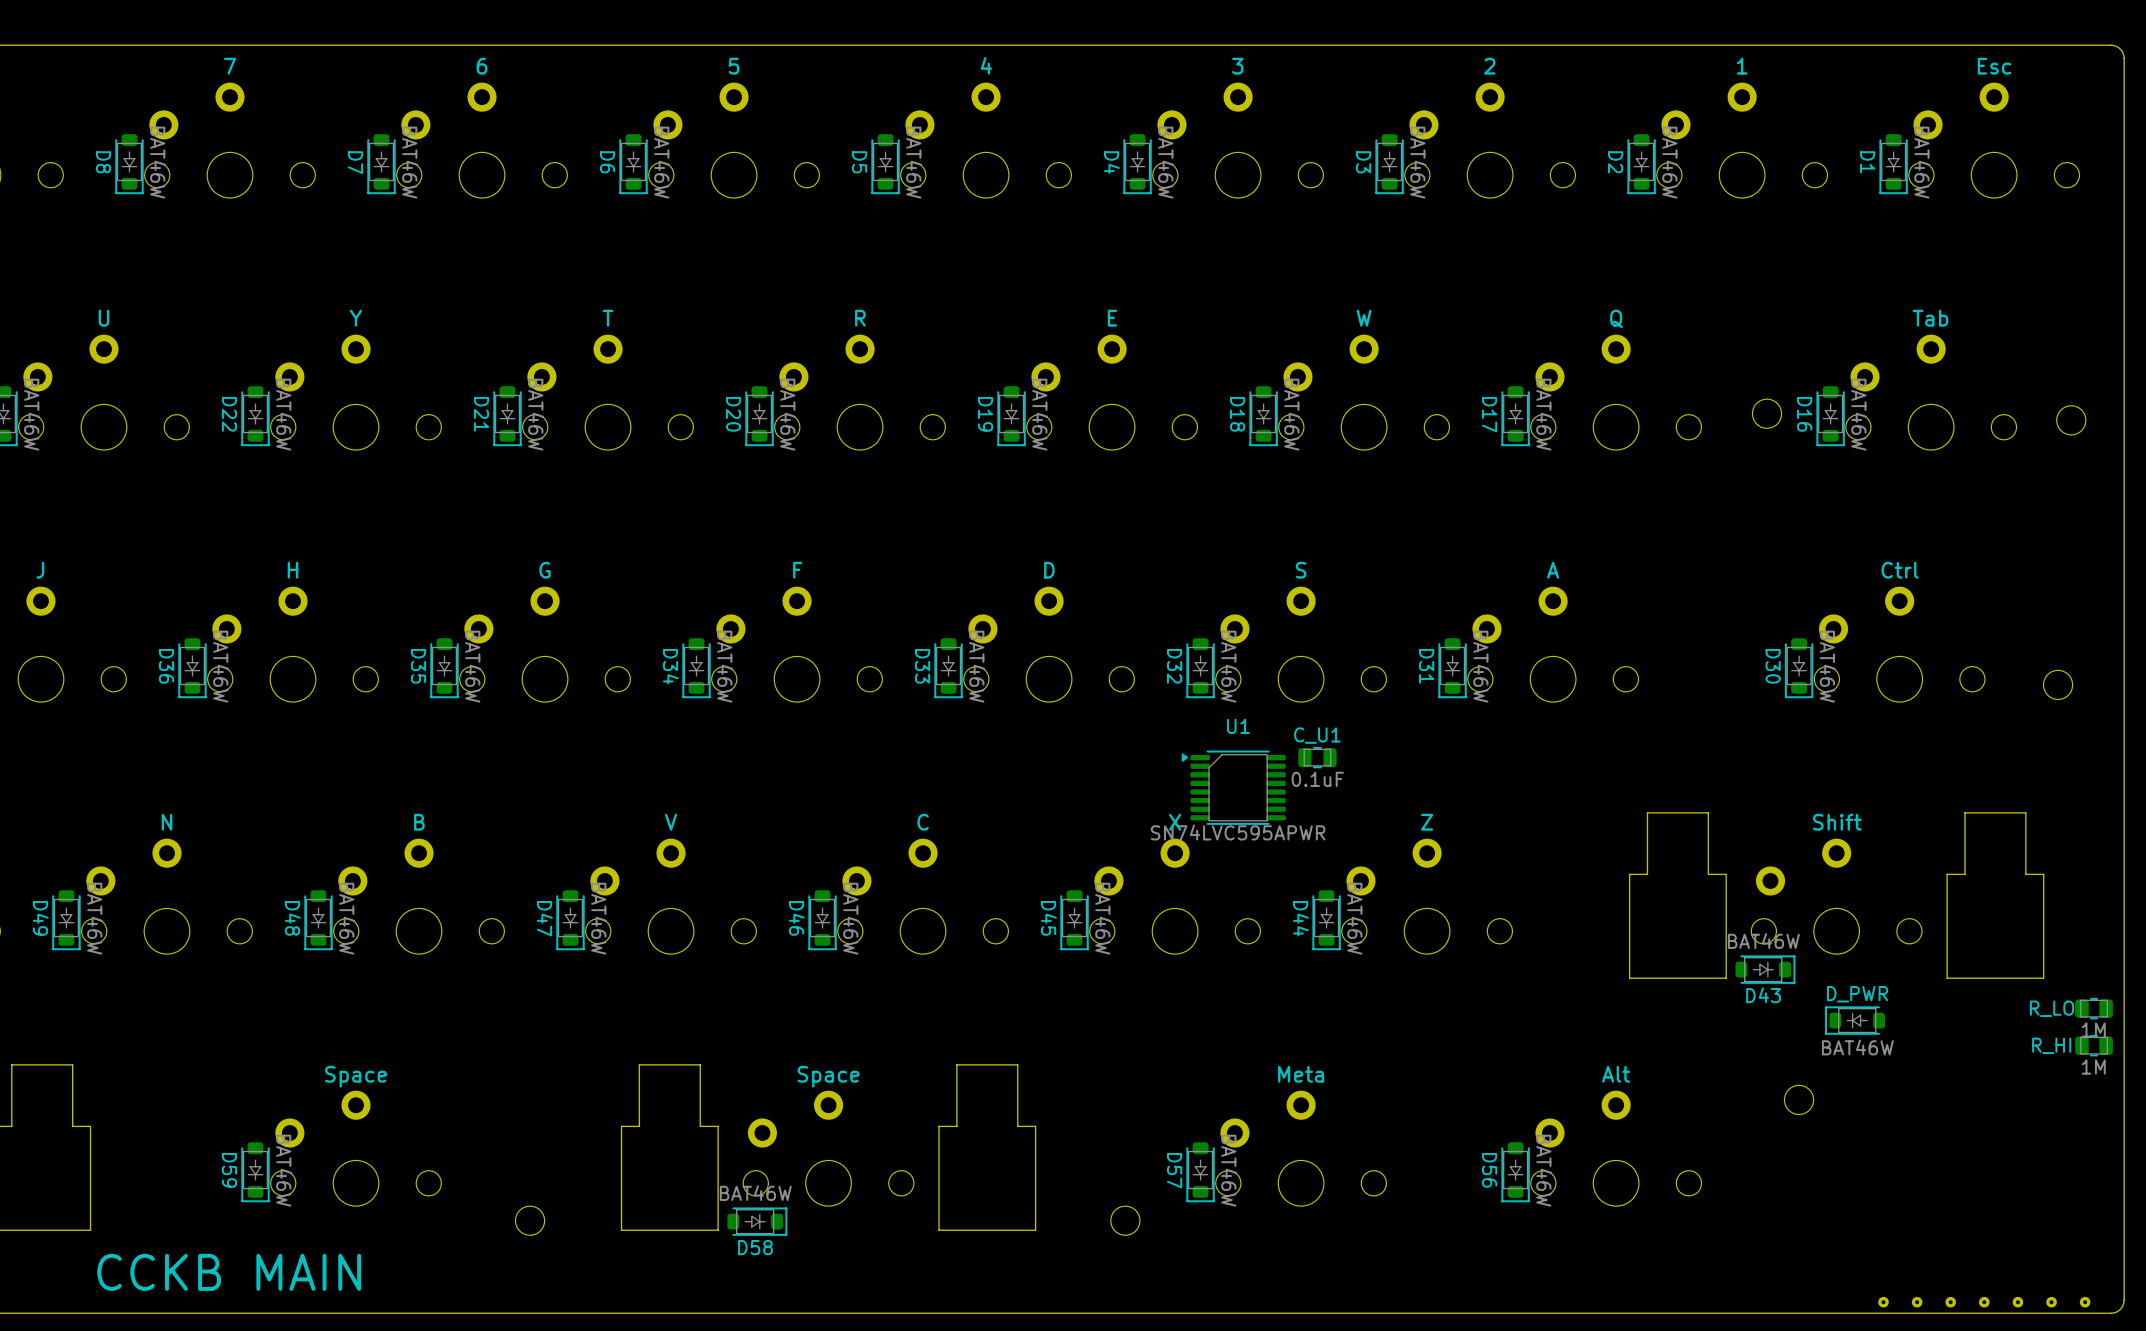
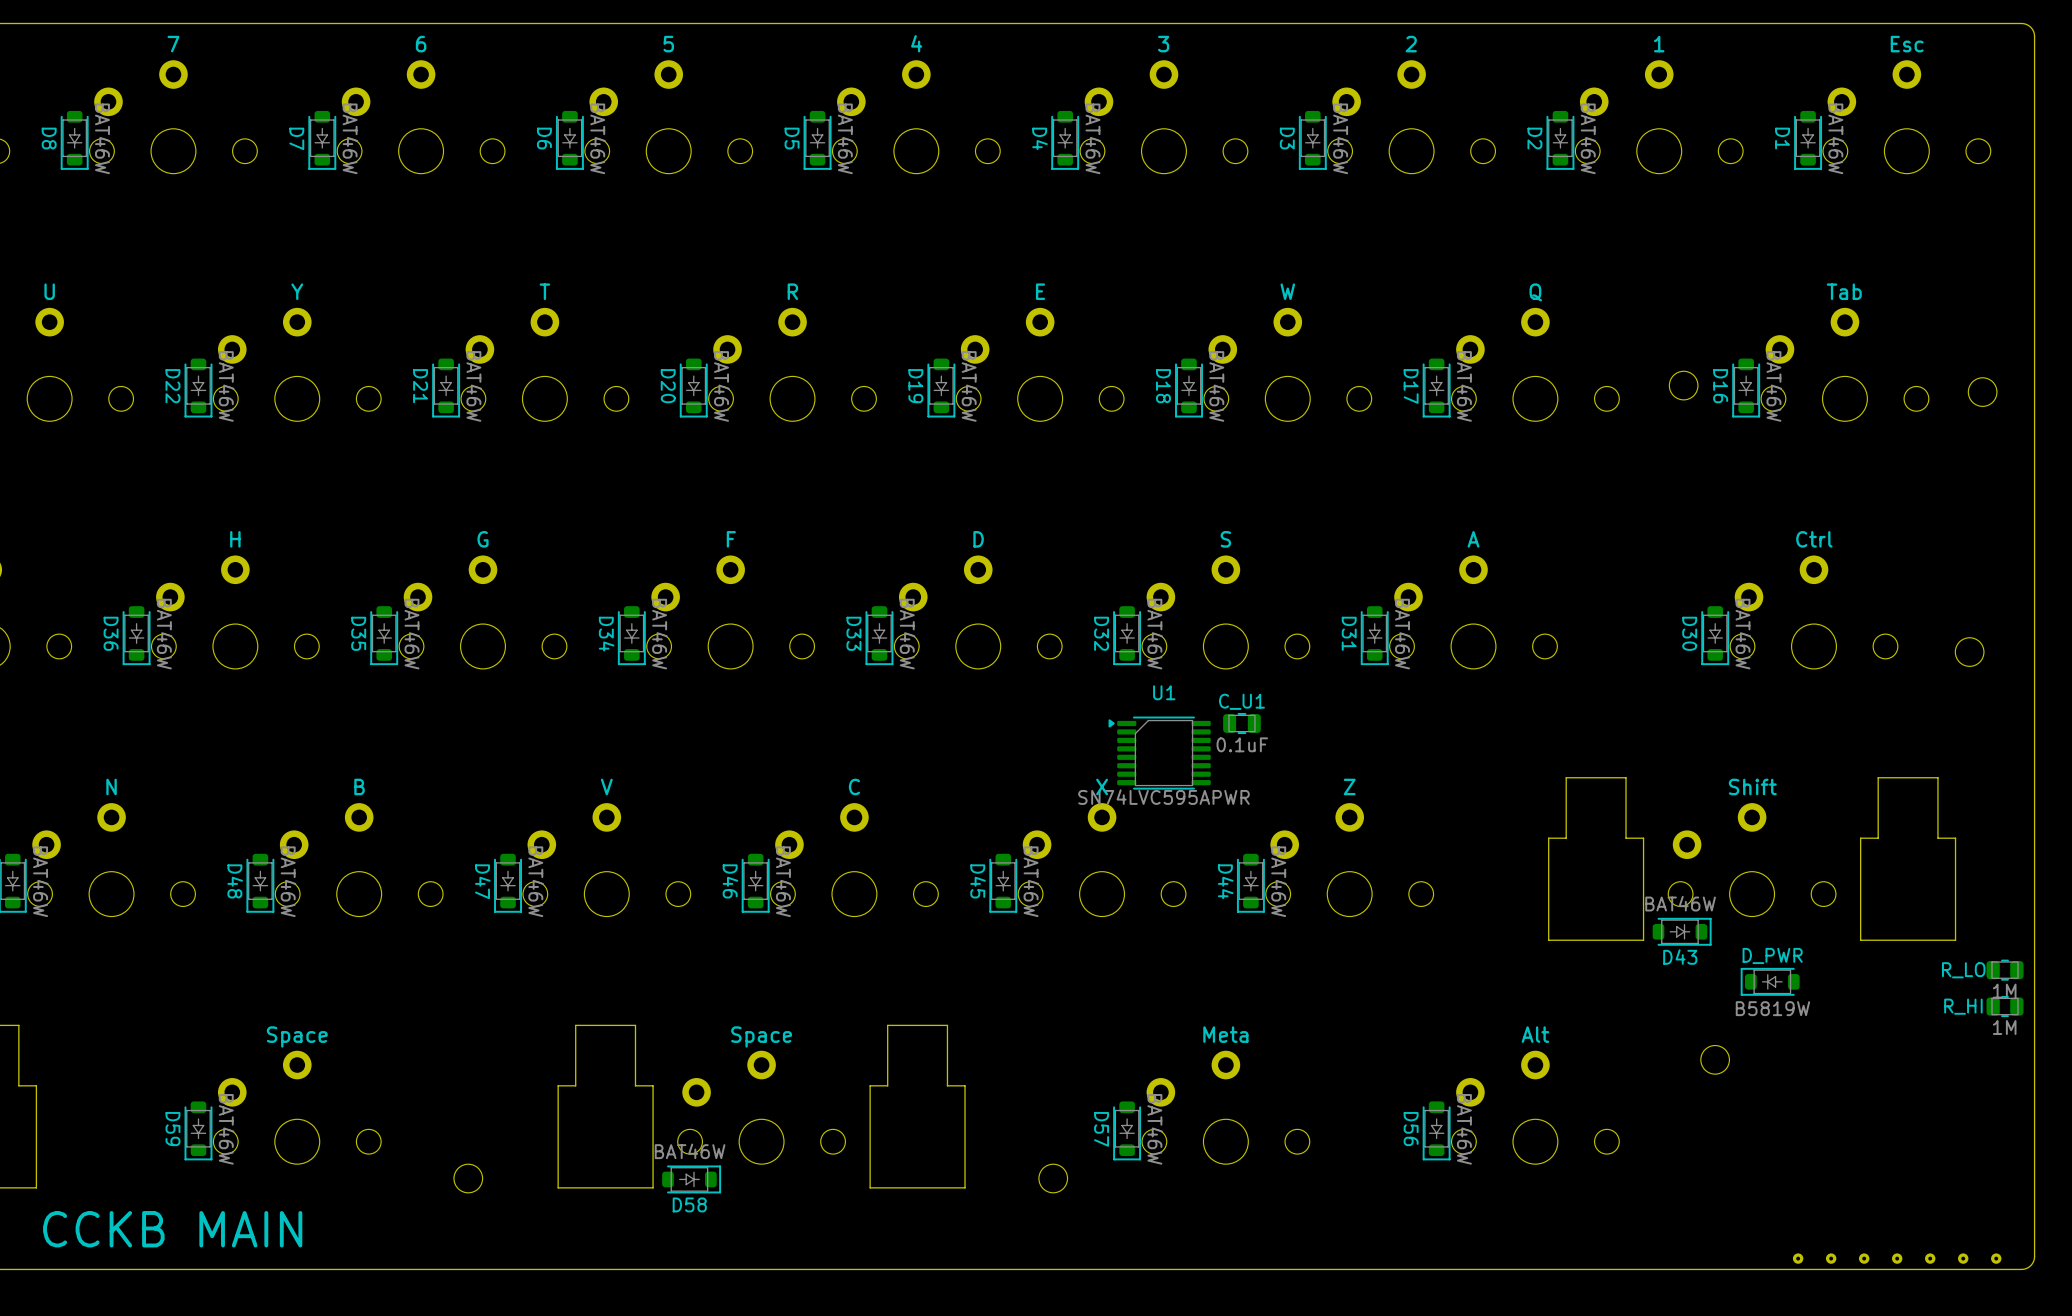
D_PWR value: BAT46W (1857, 1047) -> B5819W (1772, 1008)

